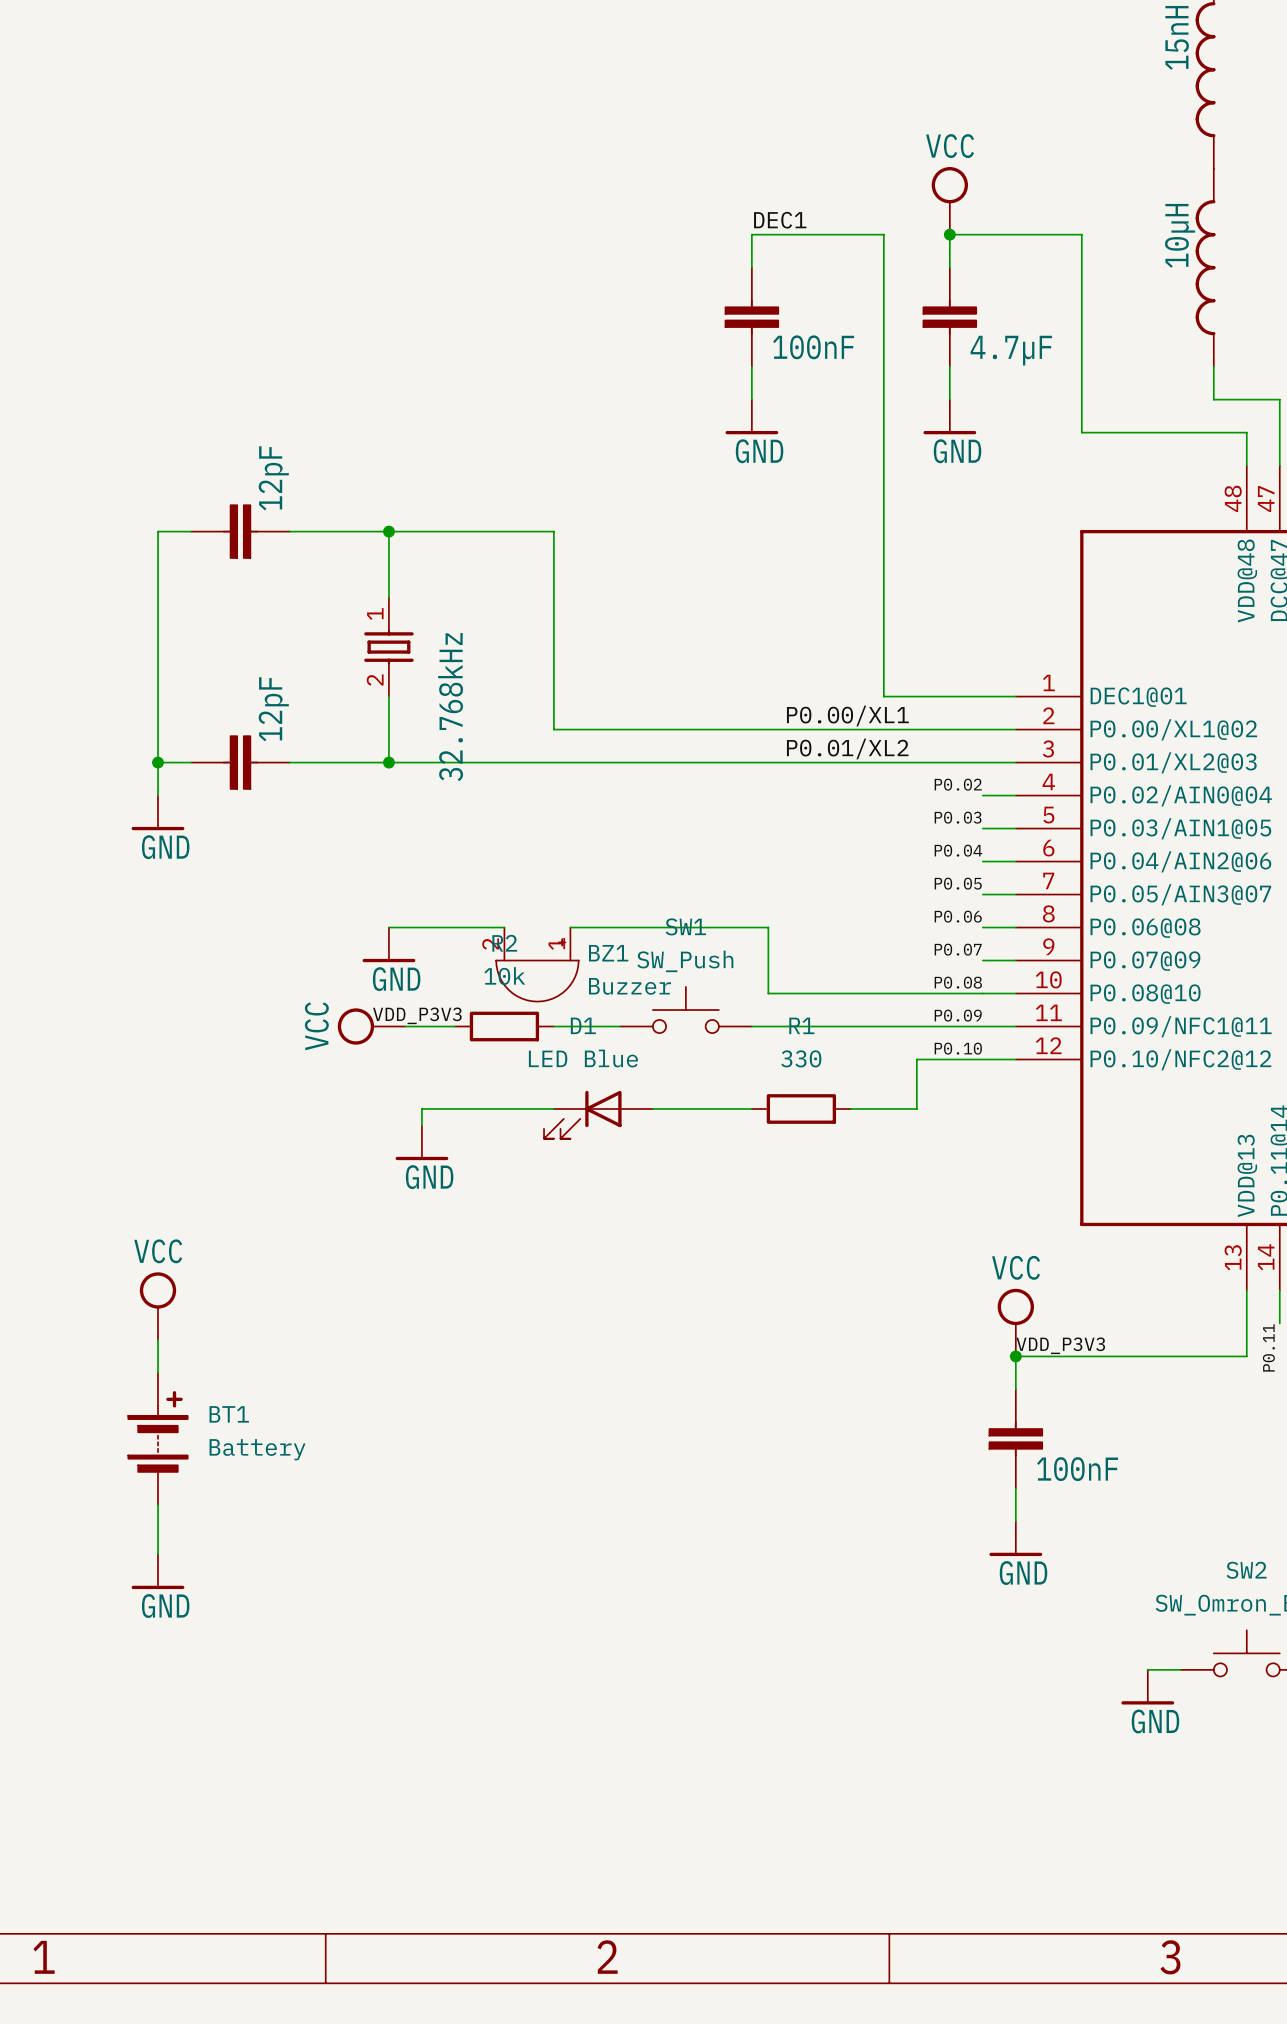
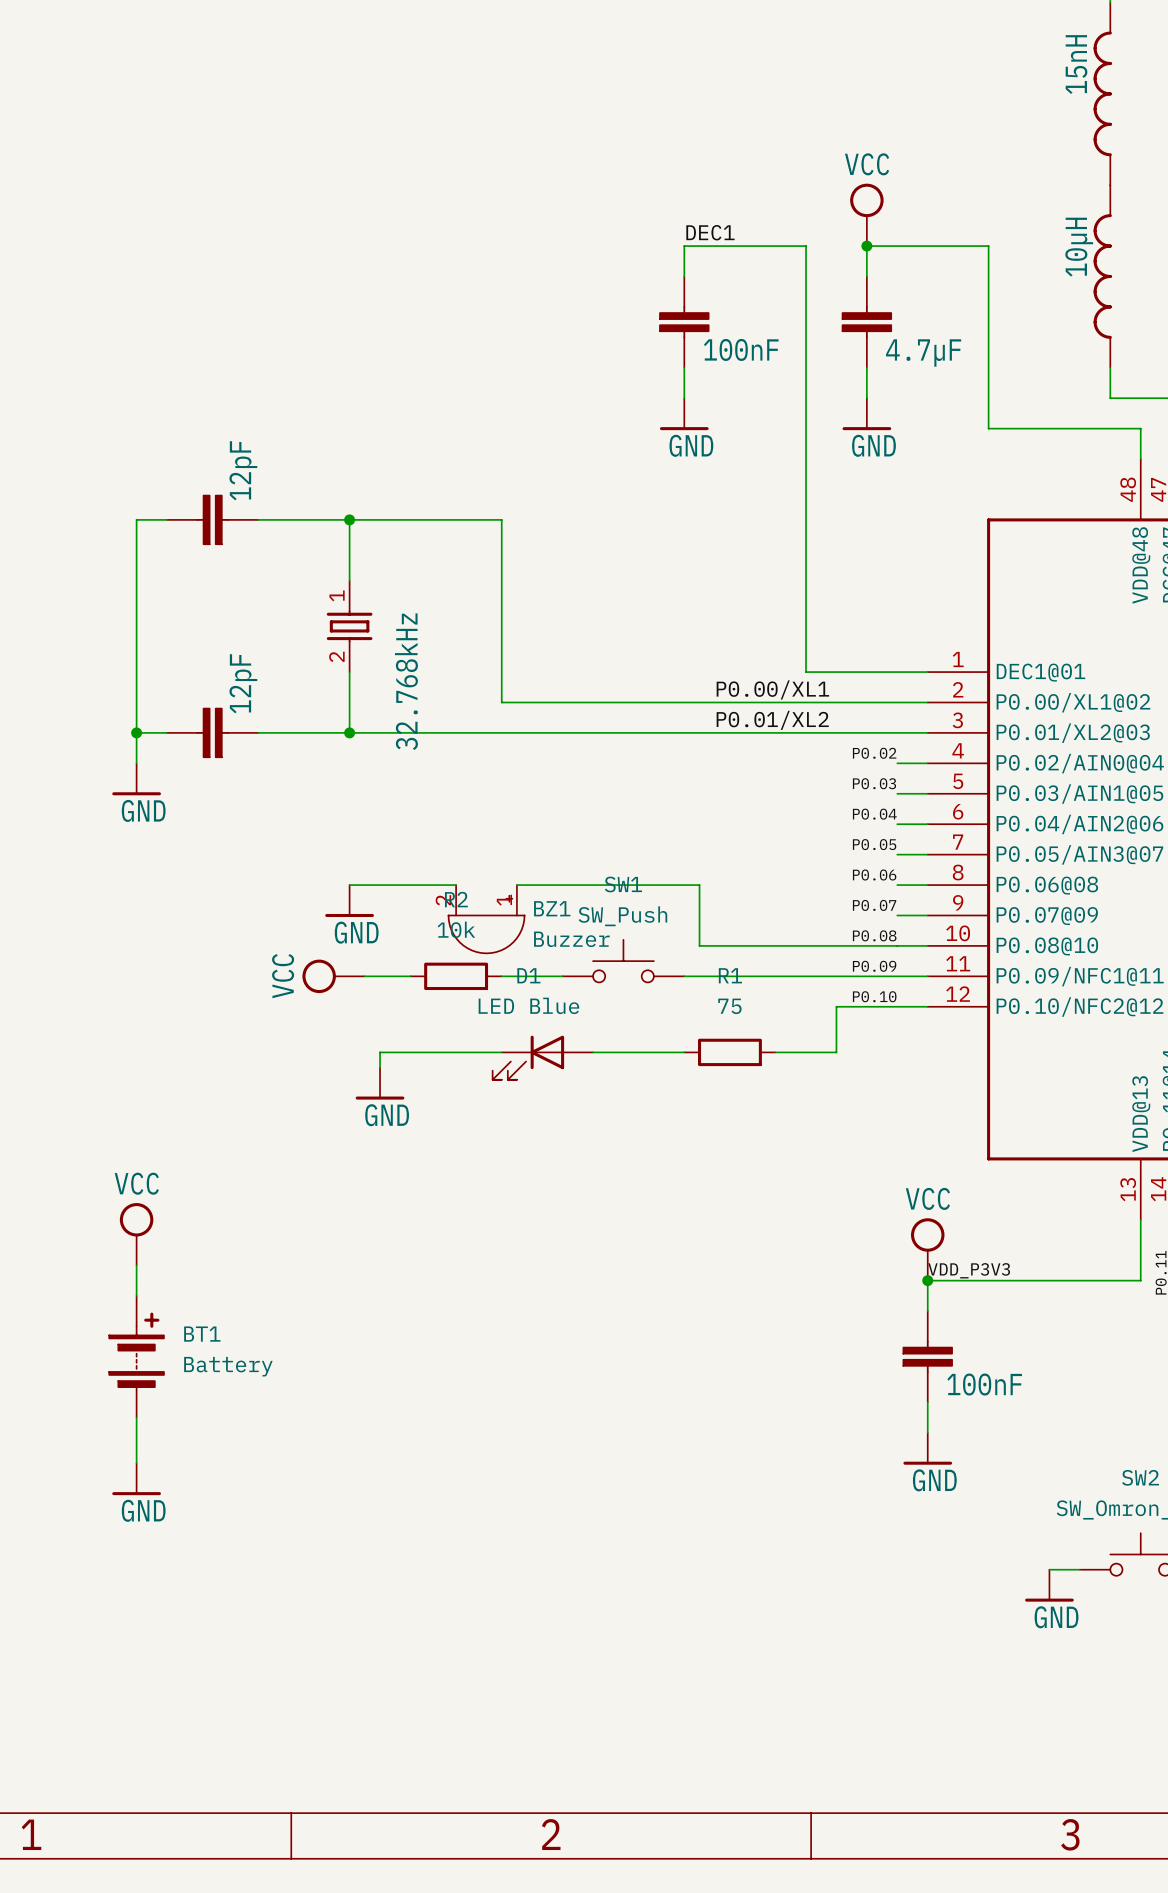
label: VDD_P3V3 (417, 1015) -> none
R1 value: 330 (801, 1058) -> 75 (729, 1006)

